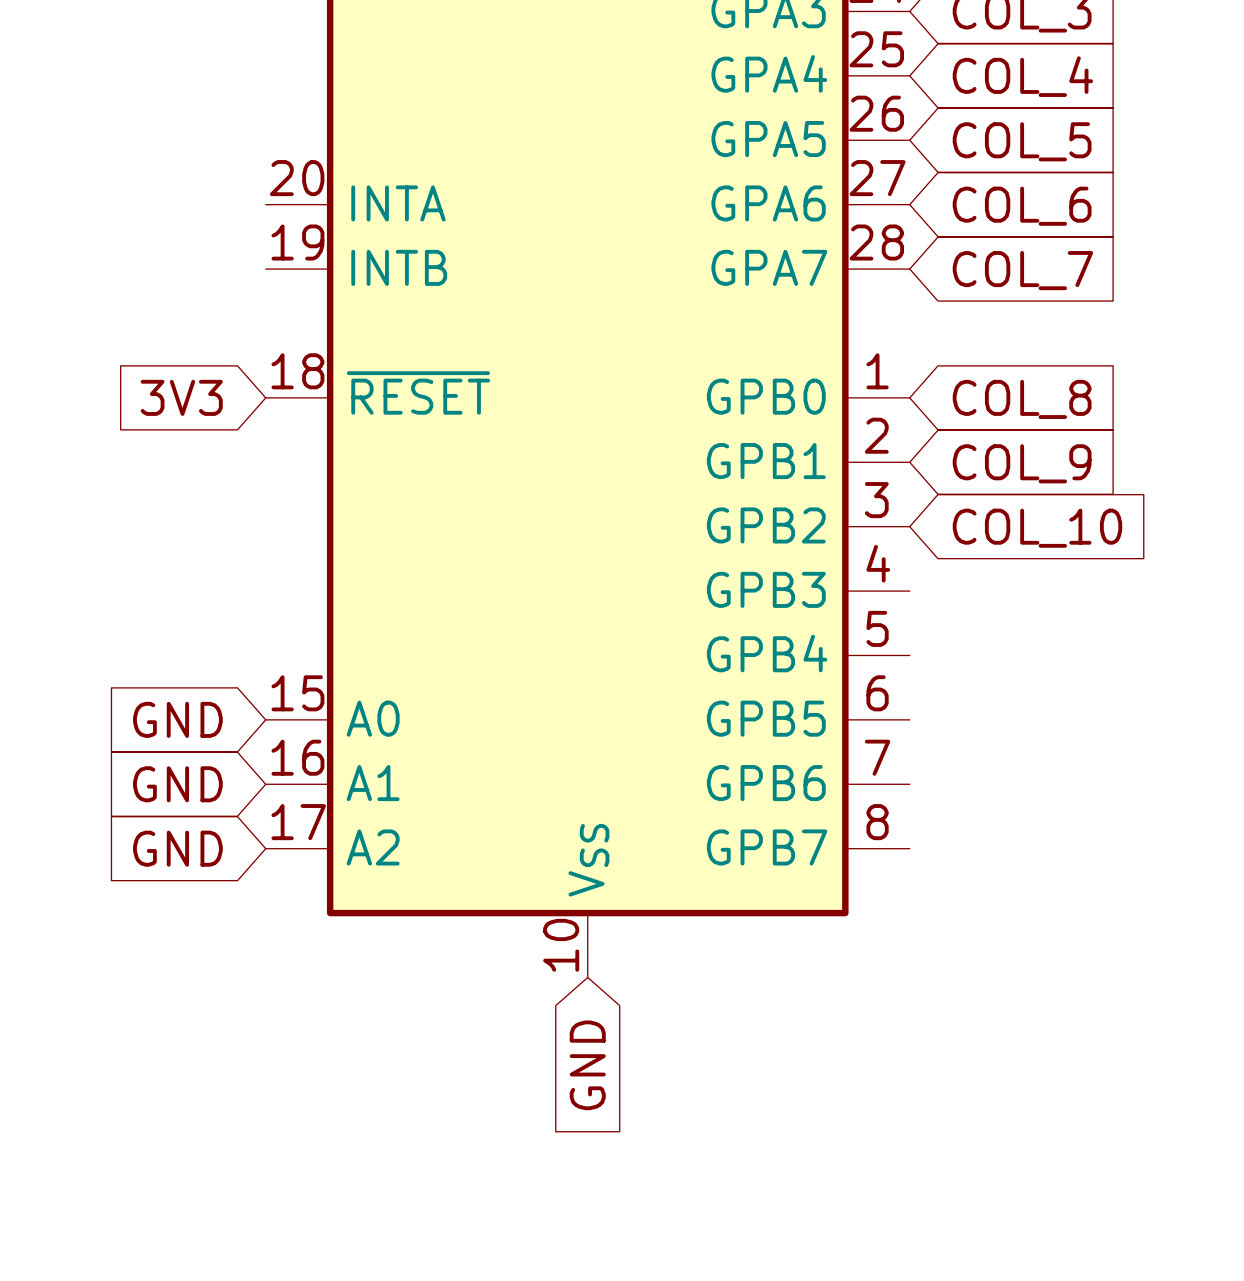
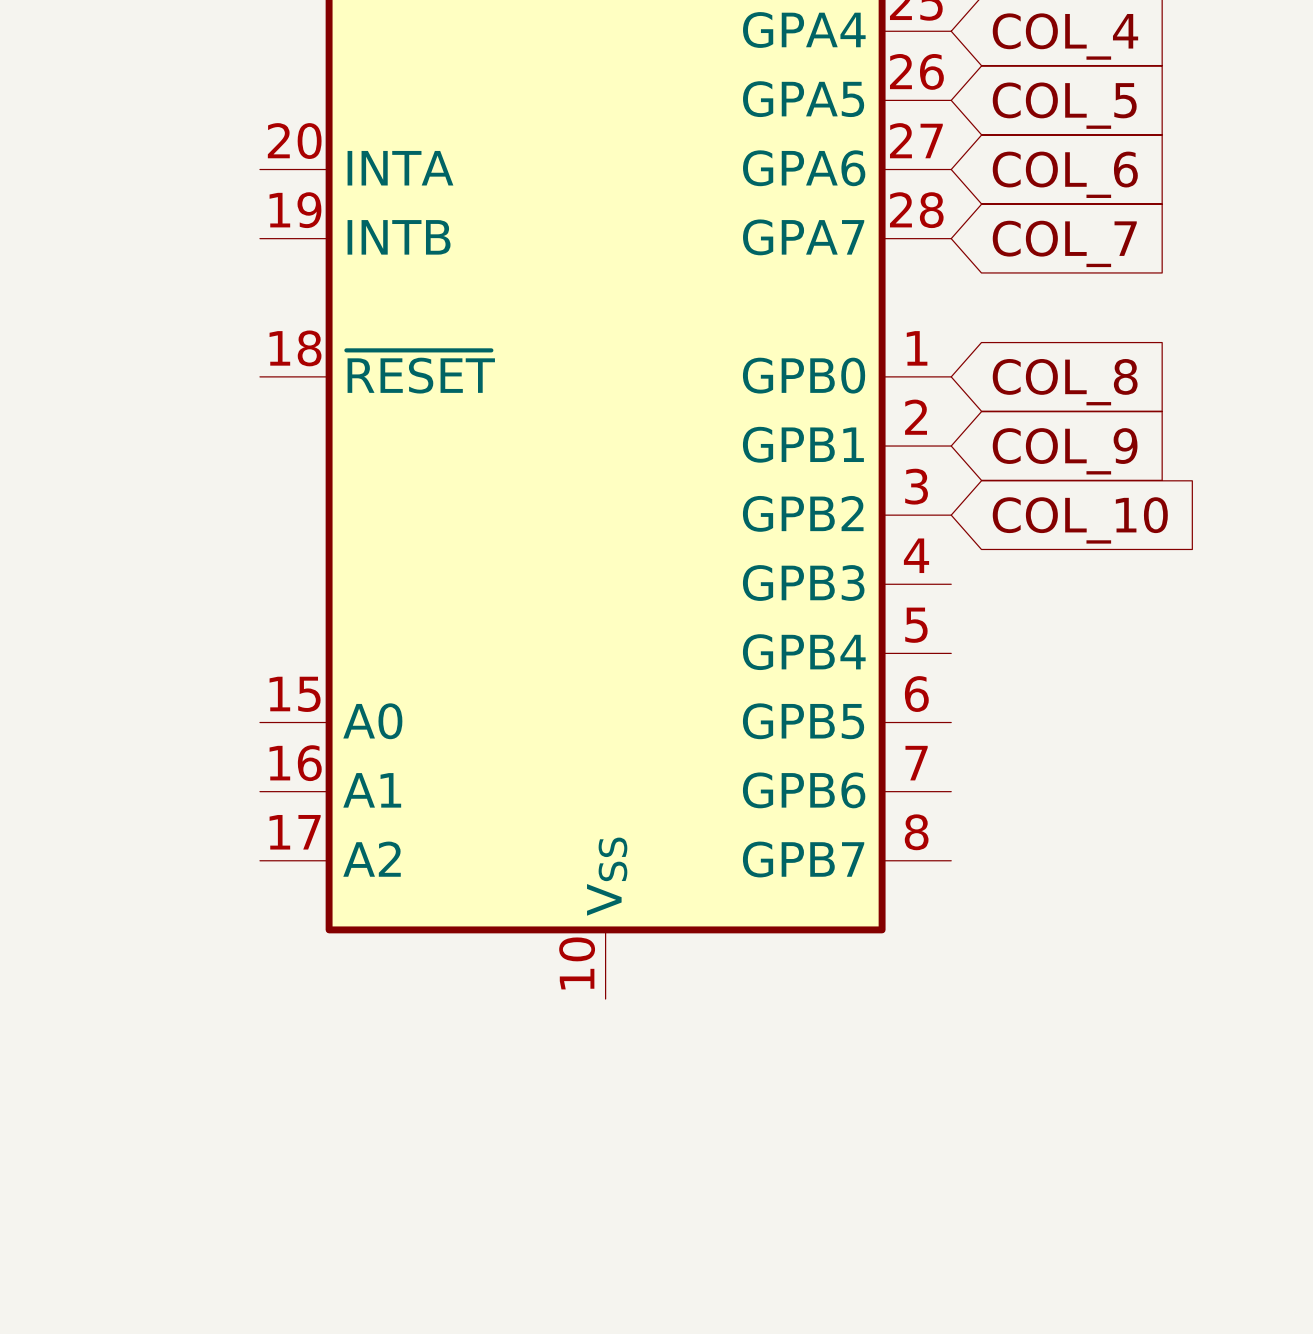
global label: 3V3 (181, 397) -> none
global label: GND (177, 719) -> none
global label: GND (177, 784) -> none
global label: GND (177, 848) -> none
global label: GND (587, 1065) -> none

